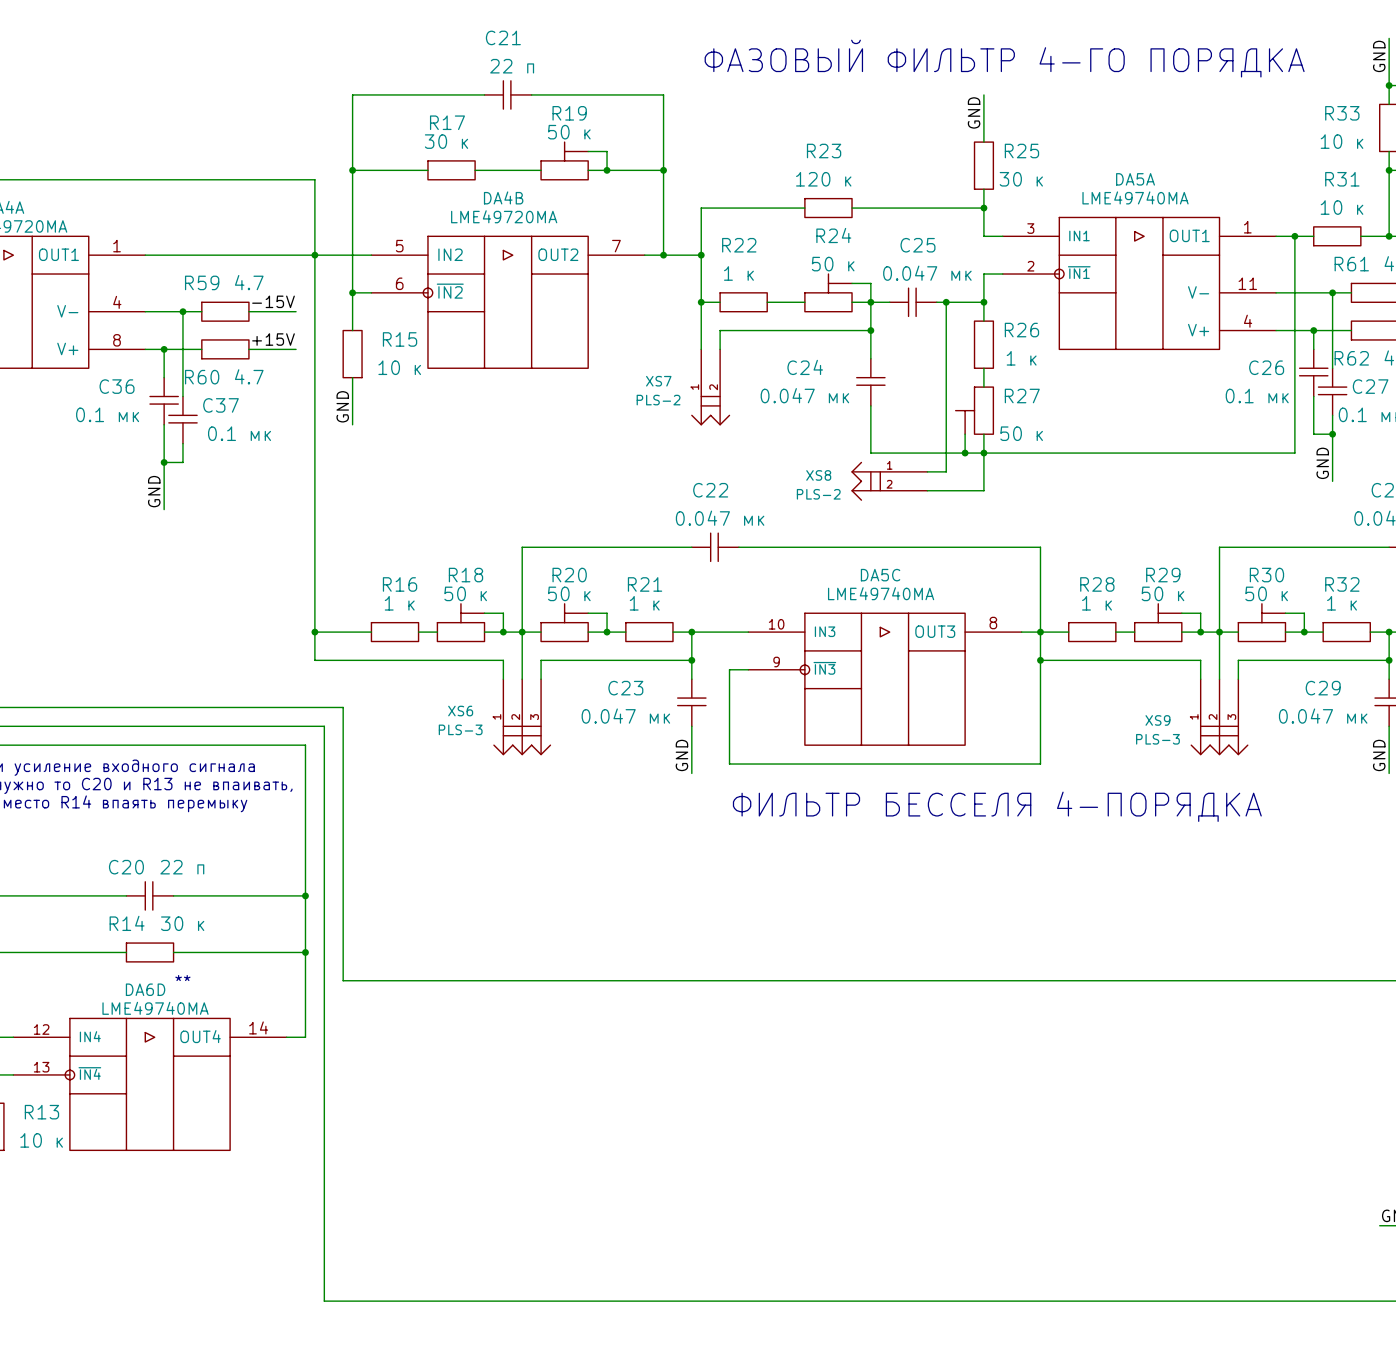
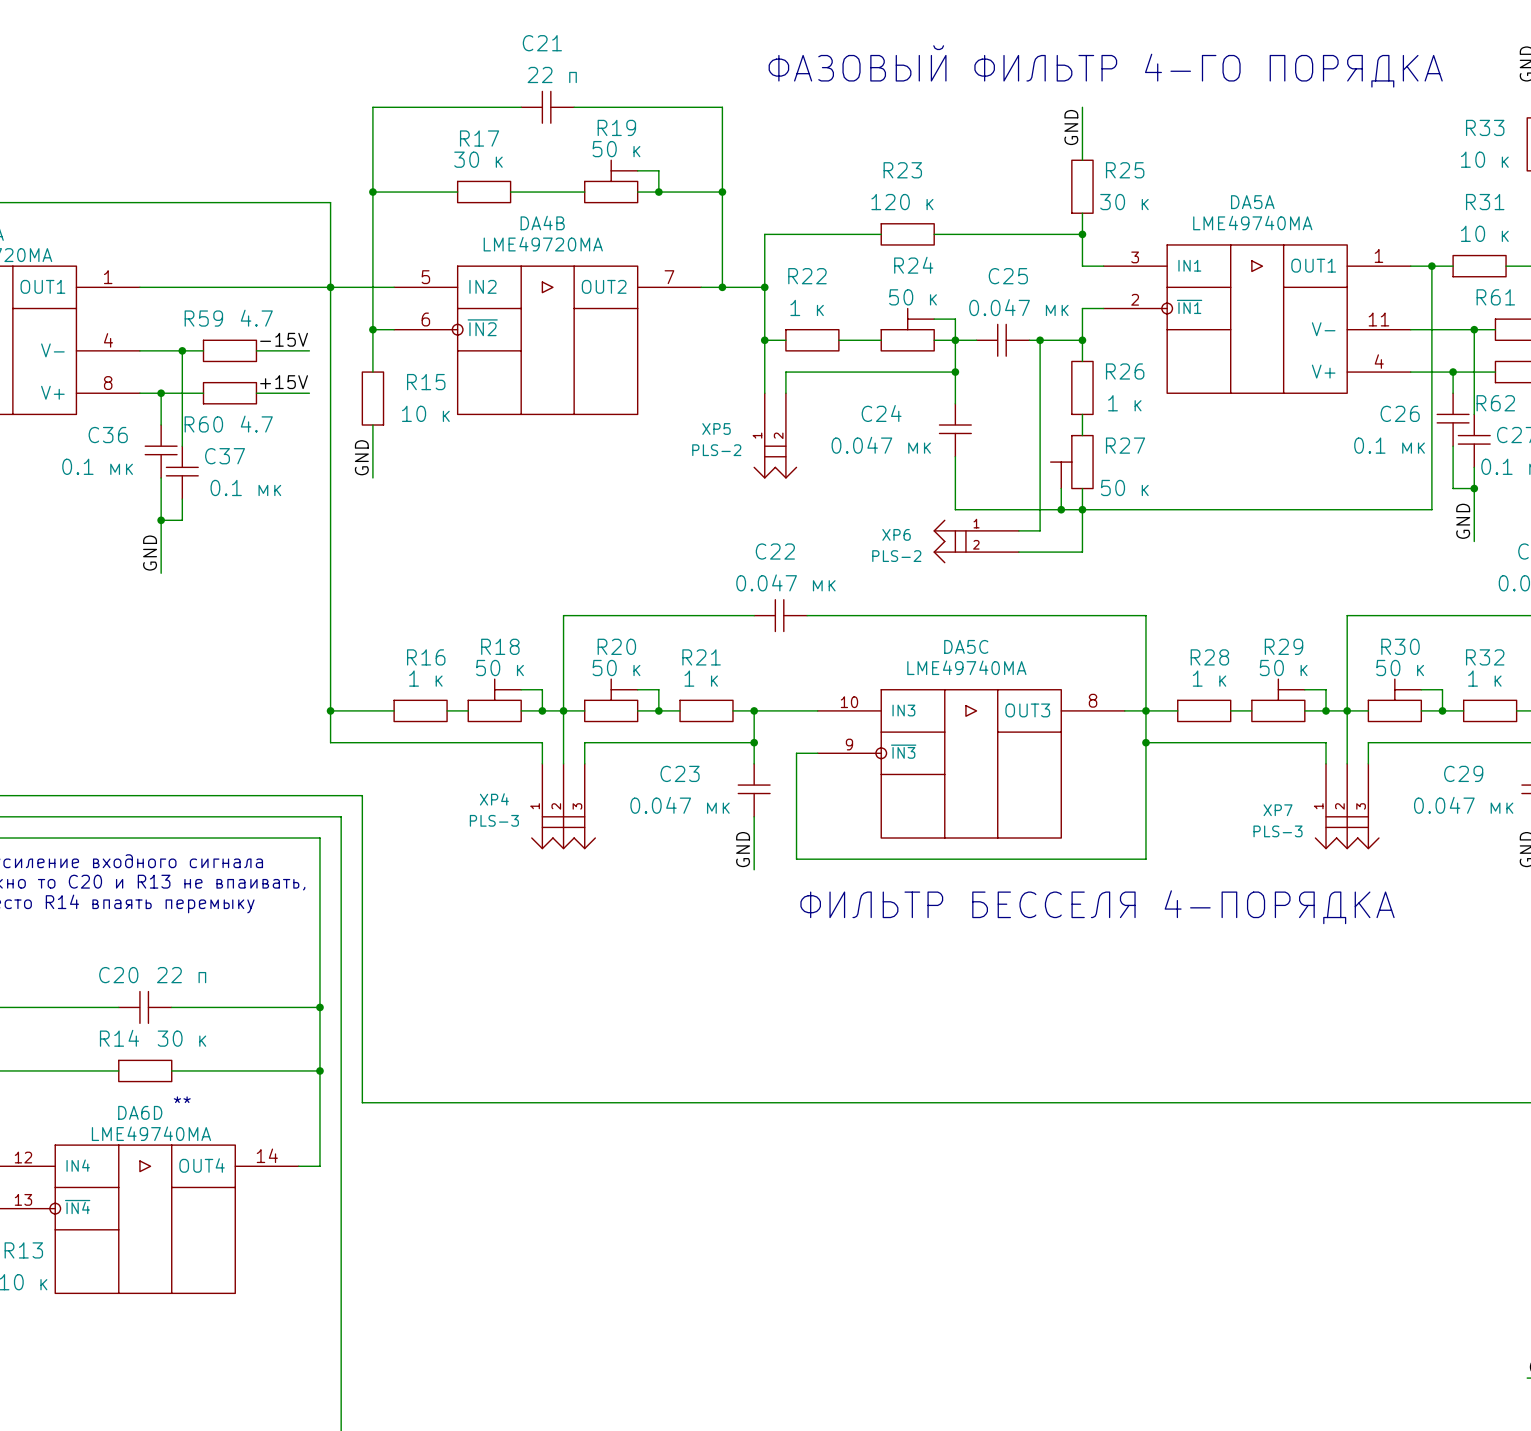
XS7 name: XS7 (658, 381) -> XP5 (716, 429)
XS8 name: XS8 (818, 475) -> XP6 (896, 534)
XS6 name: XS6 (460, 711) -> XP4 (494, 799)
XS9 name: XS9 (1157, 720) -> XP7 (1278, 810)

